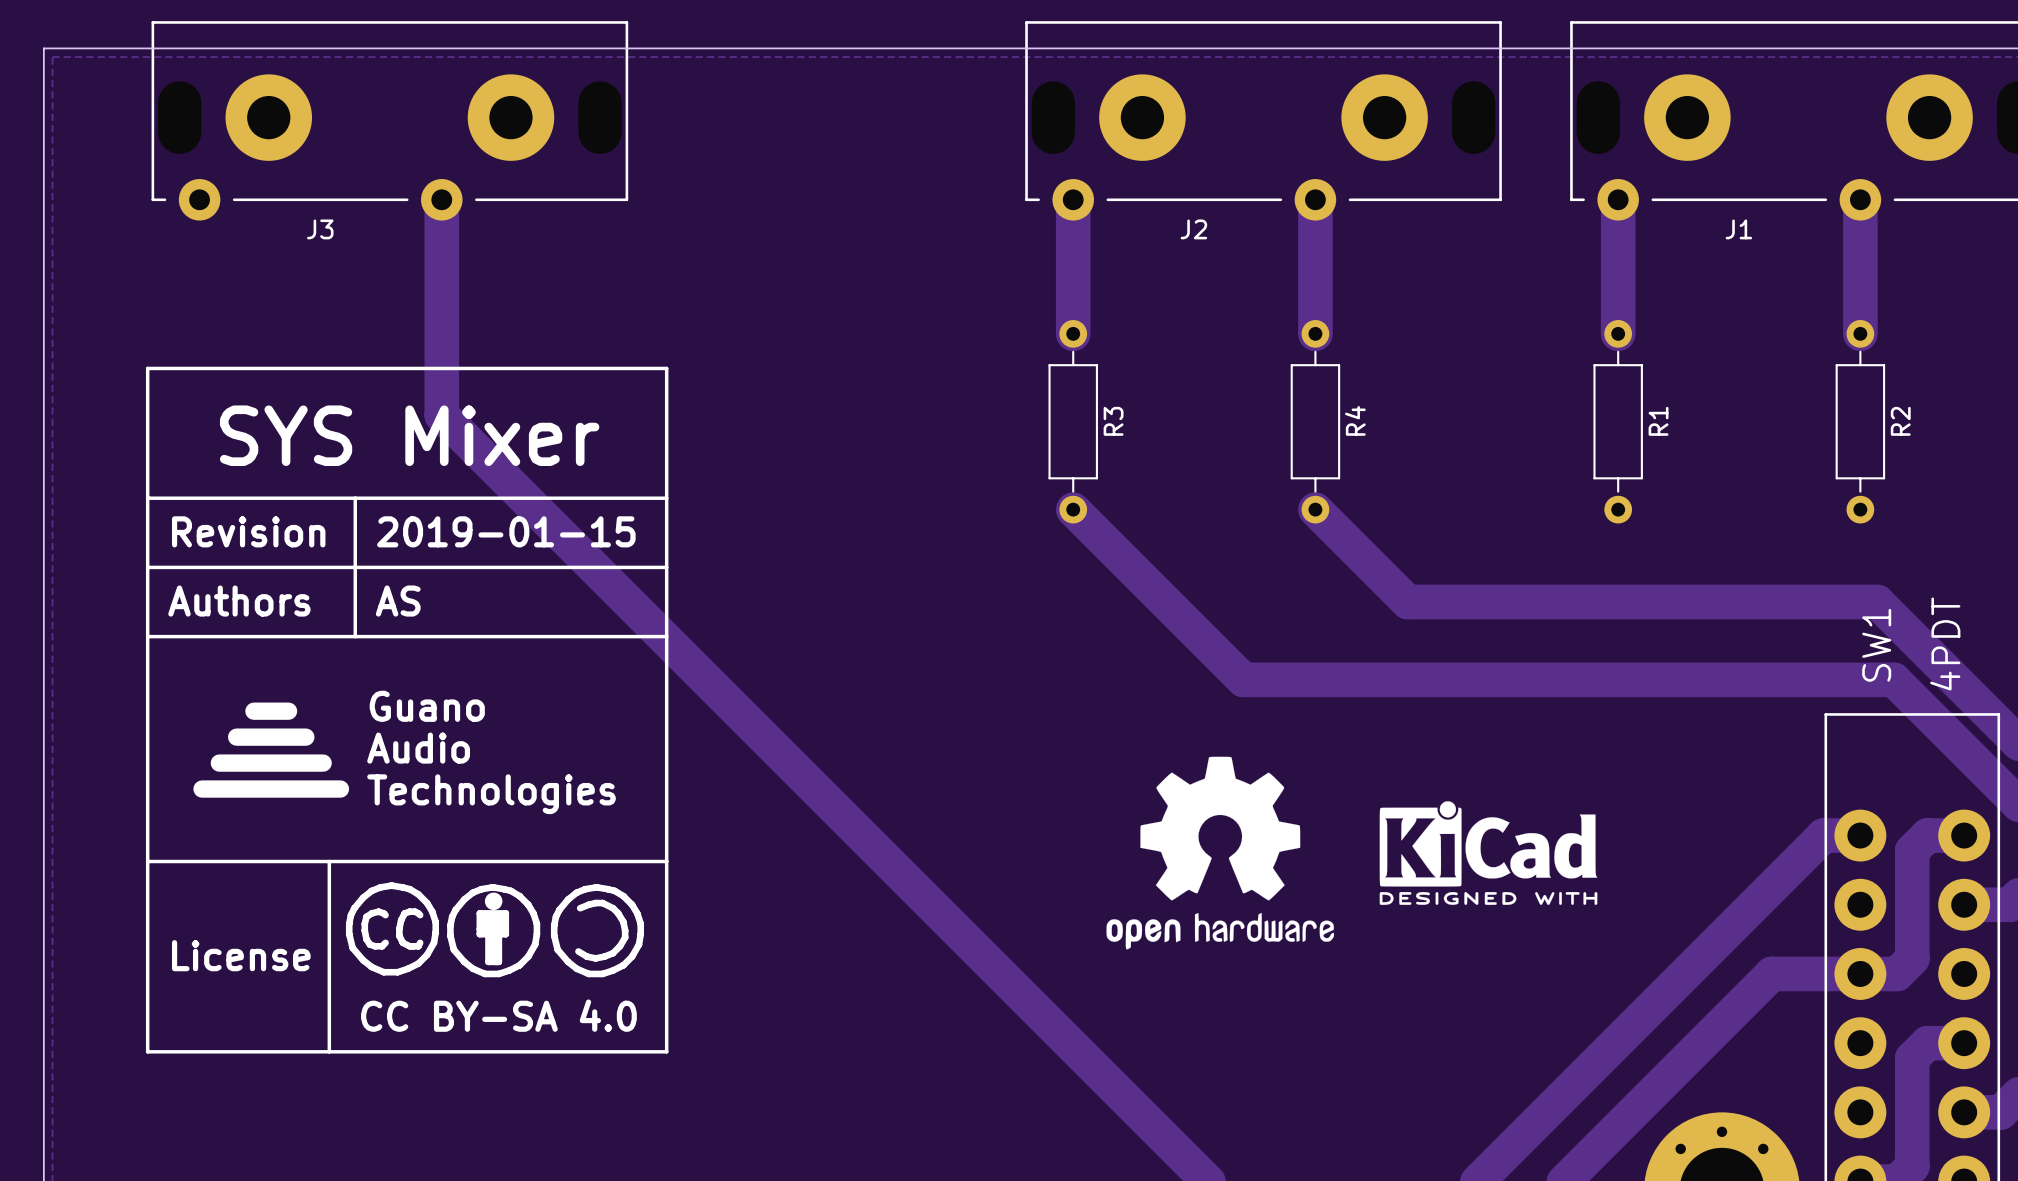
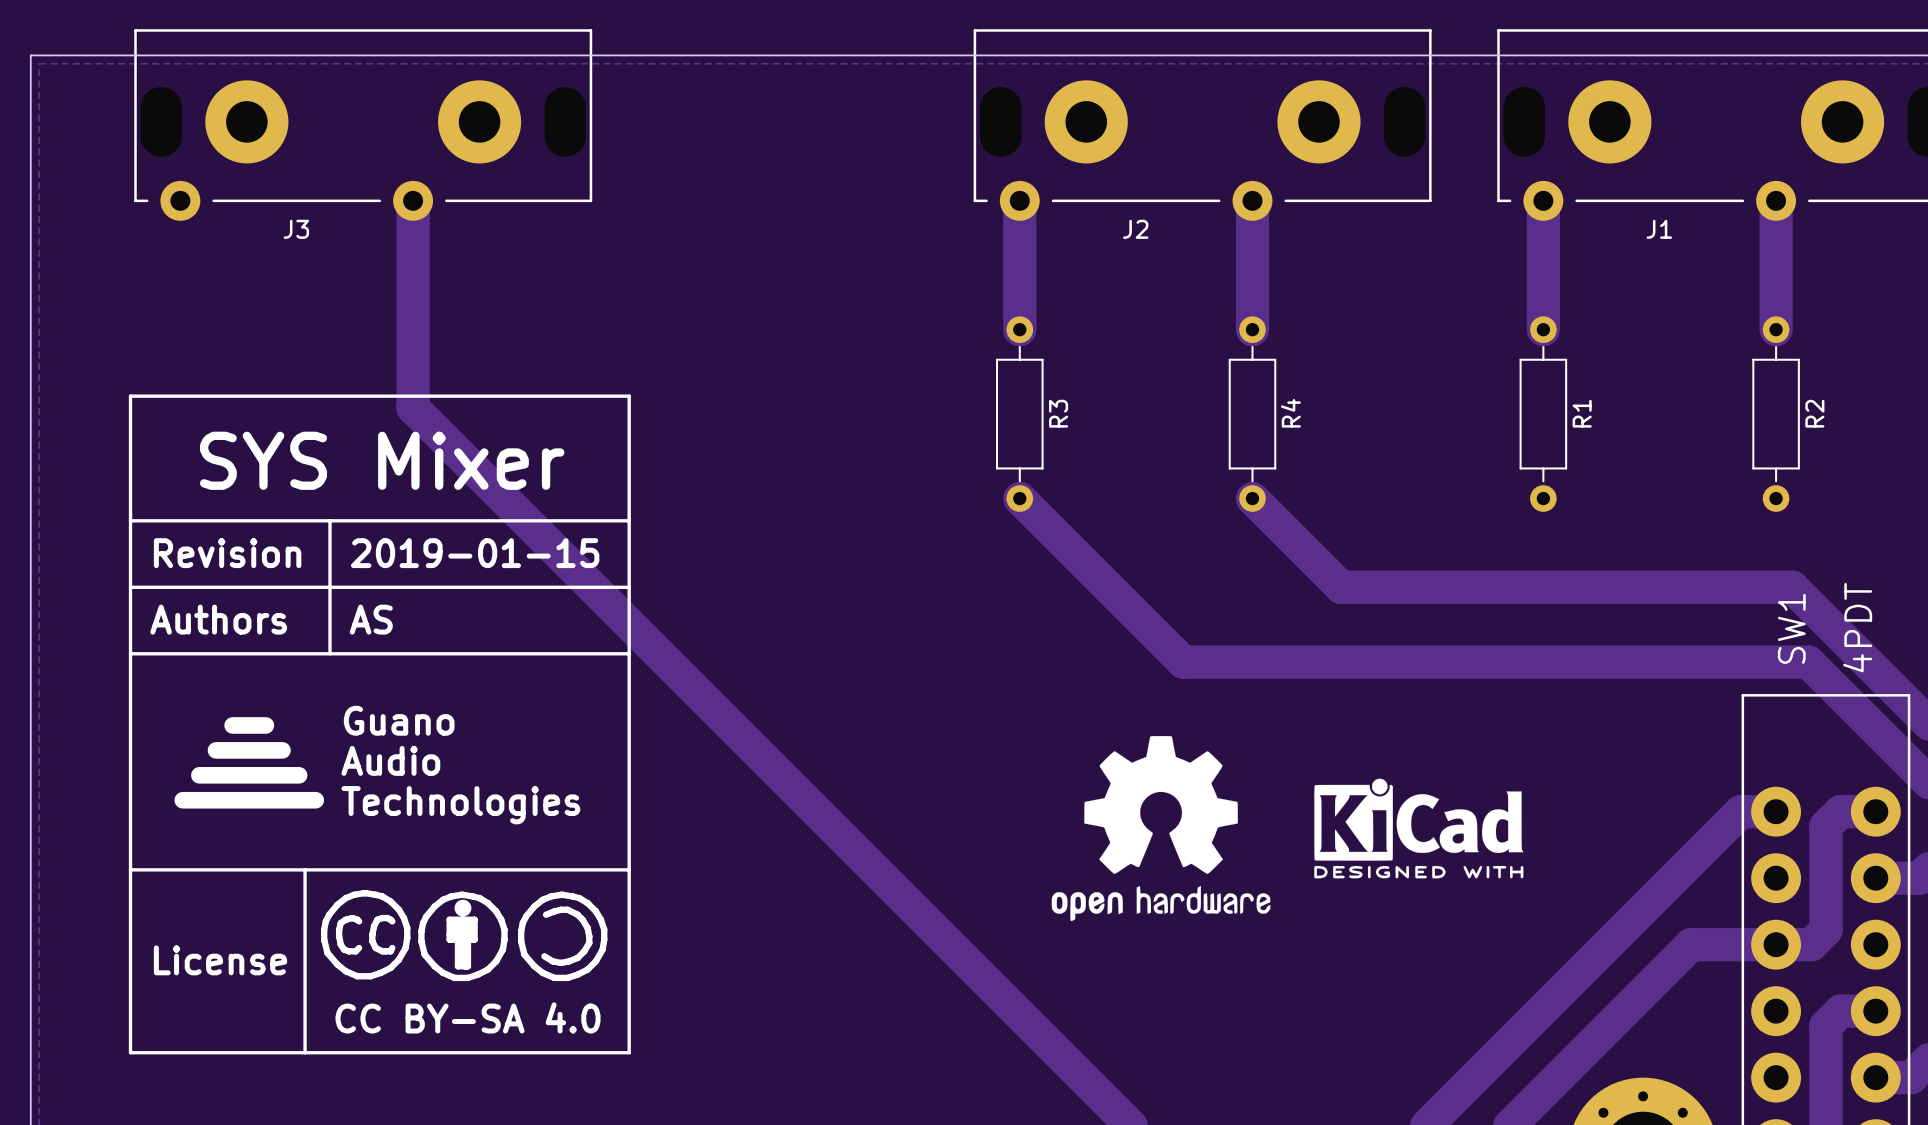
line: (147, 403) (147, 368) (666, 368) (666, 403) -> (130, 396) (629, 396)
text position: SYS Mixer (409, 435) -> SYS Mixer (382, 460)
line: (147, 498) (666, 498) -> (130, 520) (629, 520)
line: (355, 498) (355, 532) -> (329, 620) (329, 653)
text position: Revision (248, 531) -> Revision (227, 553)
text position: 2019-01-15 (506, 531) -> 2019-01-15 (475, 553)
line: (147, 567) (666, 567) -> (130, 587) (629, 587)
text position: Authors (239, 601) -> Authors (218, 619)
text position: AS (398, 601) -> AS (371, 619)
line: (147, 636) (666, 636) -> (130, 653) (629, 653)
text position: Guano (427, 706) -> Guano (399, 720)
line: (253, 711) (288, 711) -> (232, 725) (265, 725)
line: (236, 737) (305, 737) -> (216, 750) (282, 750)
text position: Audio (418, 748) -> Audio (390, 760)
line: (219, 763) (323, 763) -> (199, 775) (299, 775)
line: (202, 789) (340, 789) -> (182, 800) (315, 800)
text position: Technologies (491, 794) -> Technologies (460, 805)
line: (147, 861) (666, 861) -> (130, 869) (629, 869)
line: (329, 861) (329, 896) -> (305, 1019) (305, 1052)
drawing position: (392, 928) -> (365, 934)
drawing position: (493, 930) -> (462, 936)
drawing position: (597, 930) -> (562, 936)
text position: License (241, 955) -> License (220, 960)
text position: CC BY-SA 4.0 (498, 1015) -> CC BY-SA 4.0 (468, 1017)
line: (147, 1051) (666, 1051) -> (130, 1019) (130, 1052) (629, 1052) (629, 1019)

